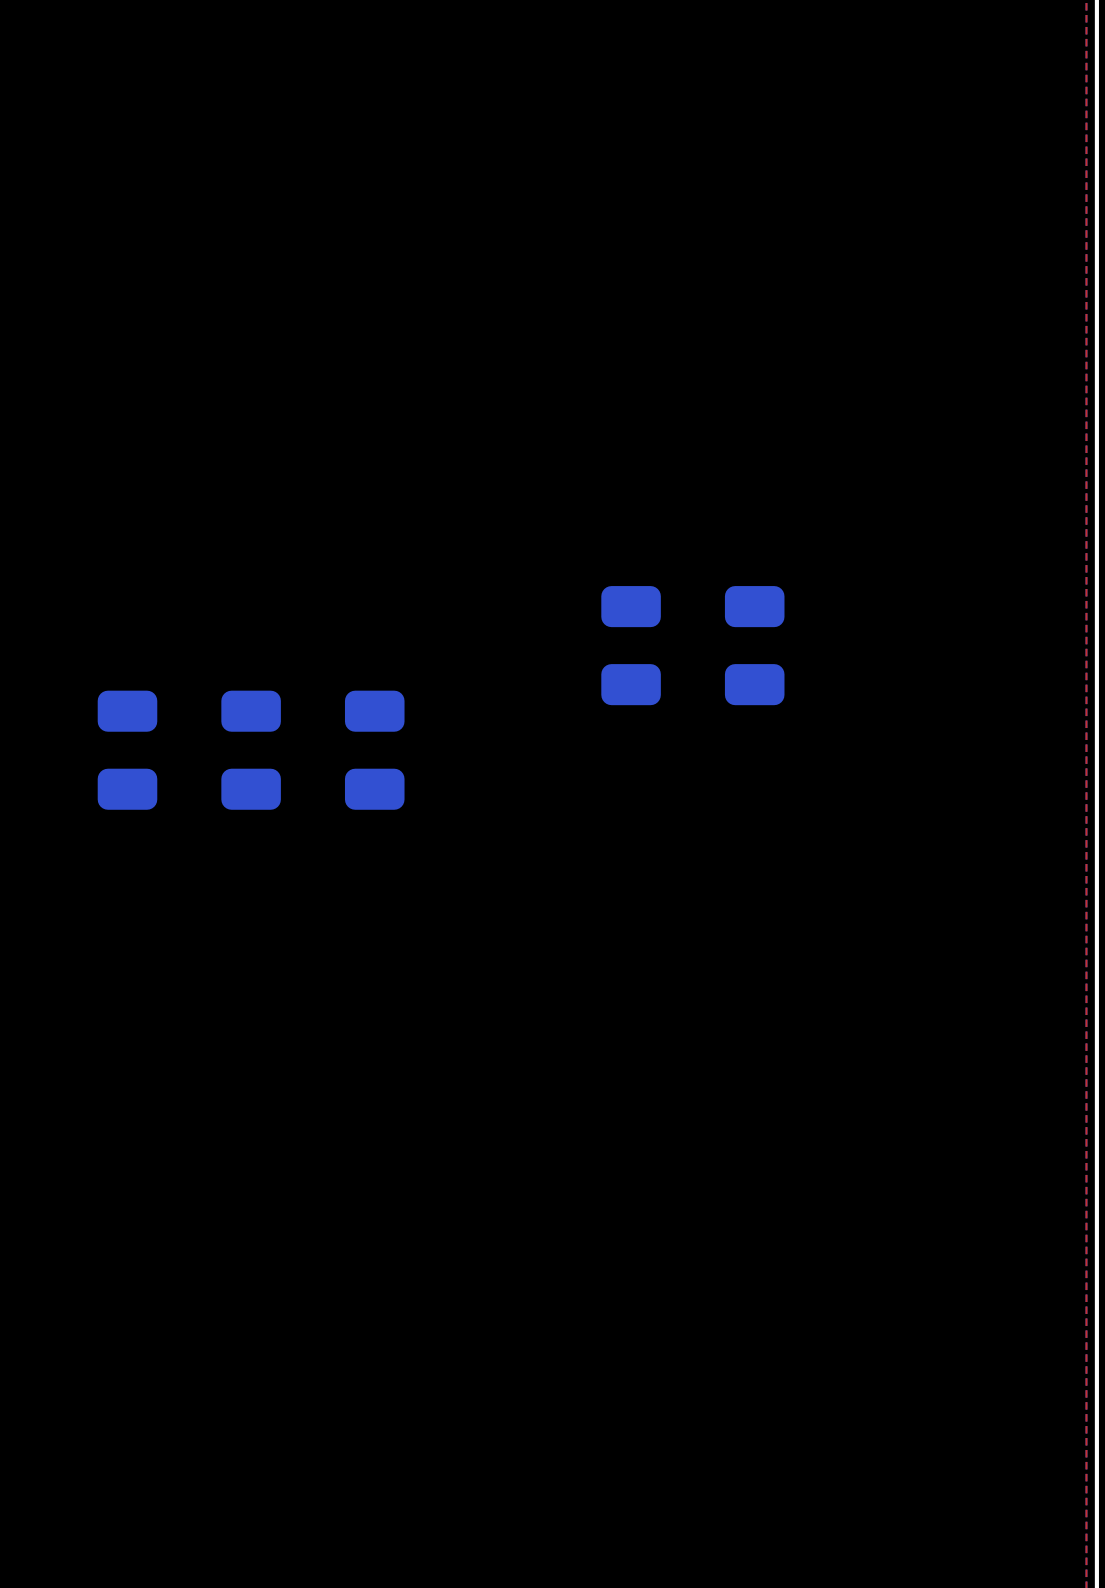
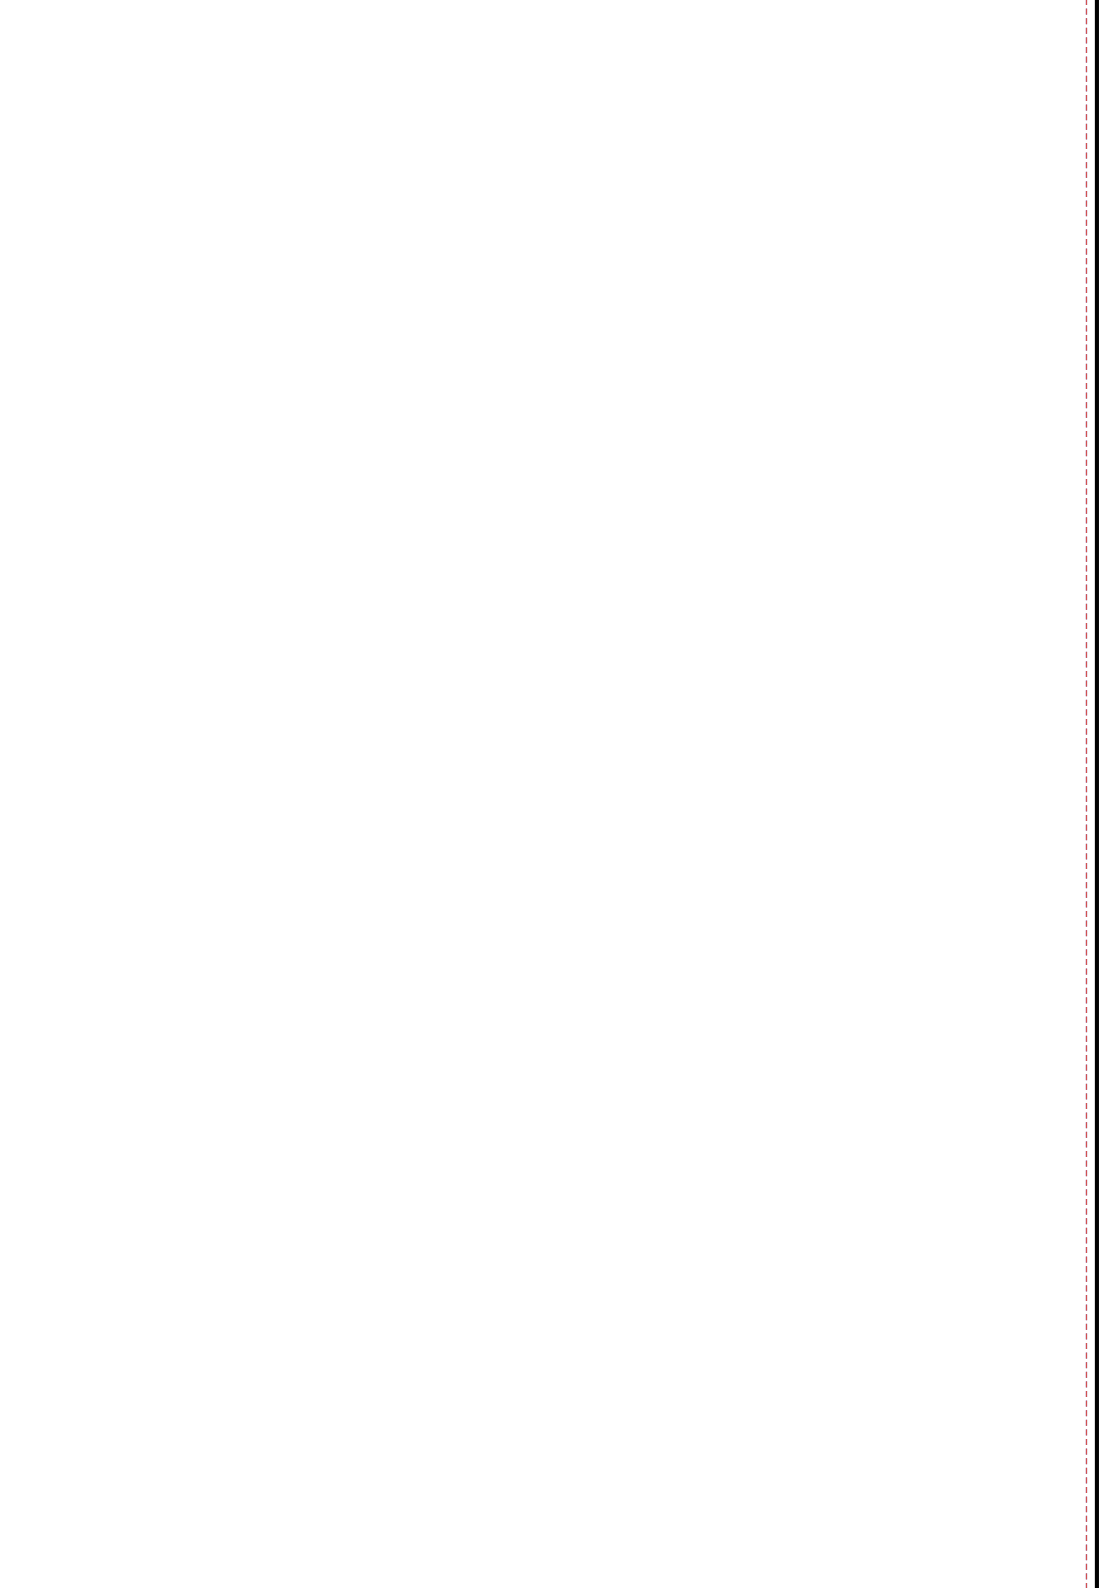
part: (631, 645) -> none
part: (754, 645) -> none
part: (127, 750) -> none
part: (251, 750) -> none
part: (374, 750) -> none

